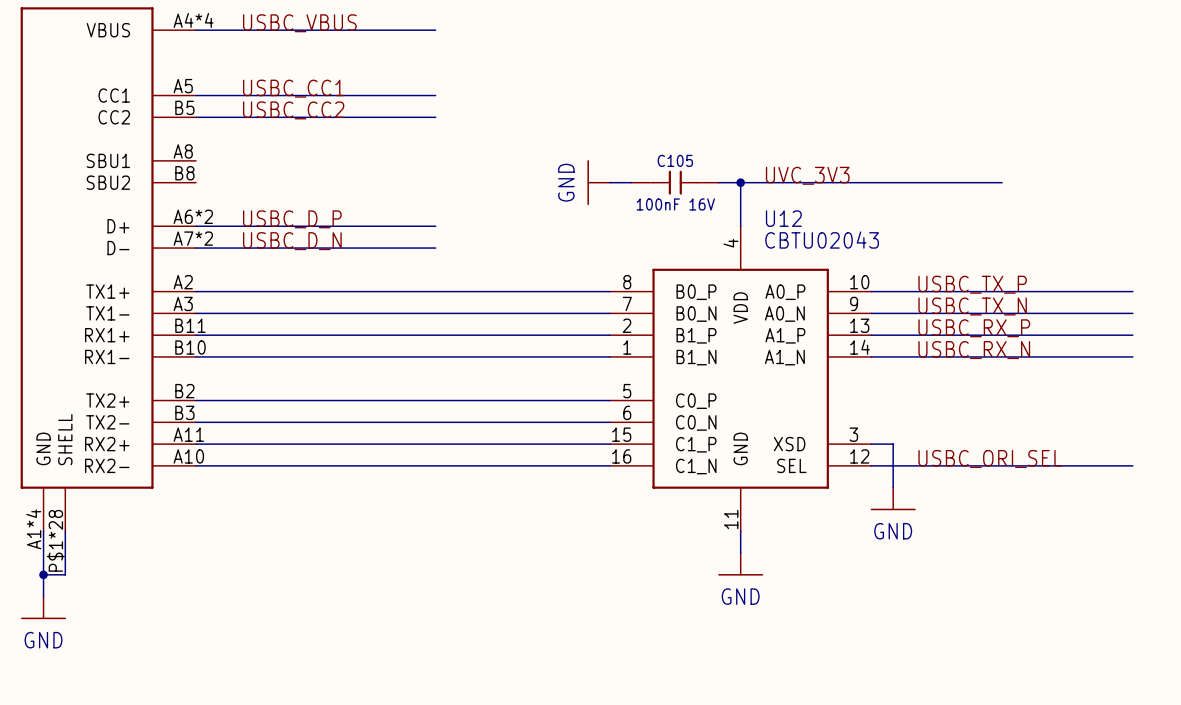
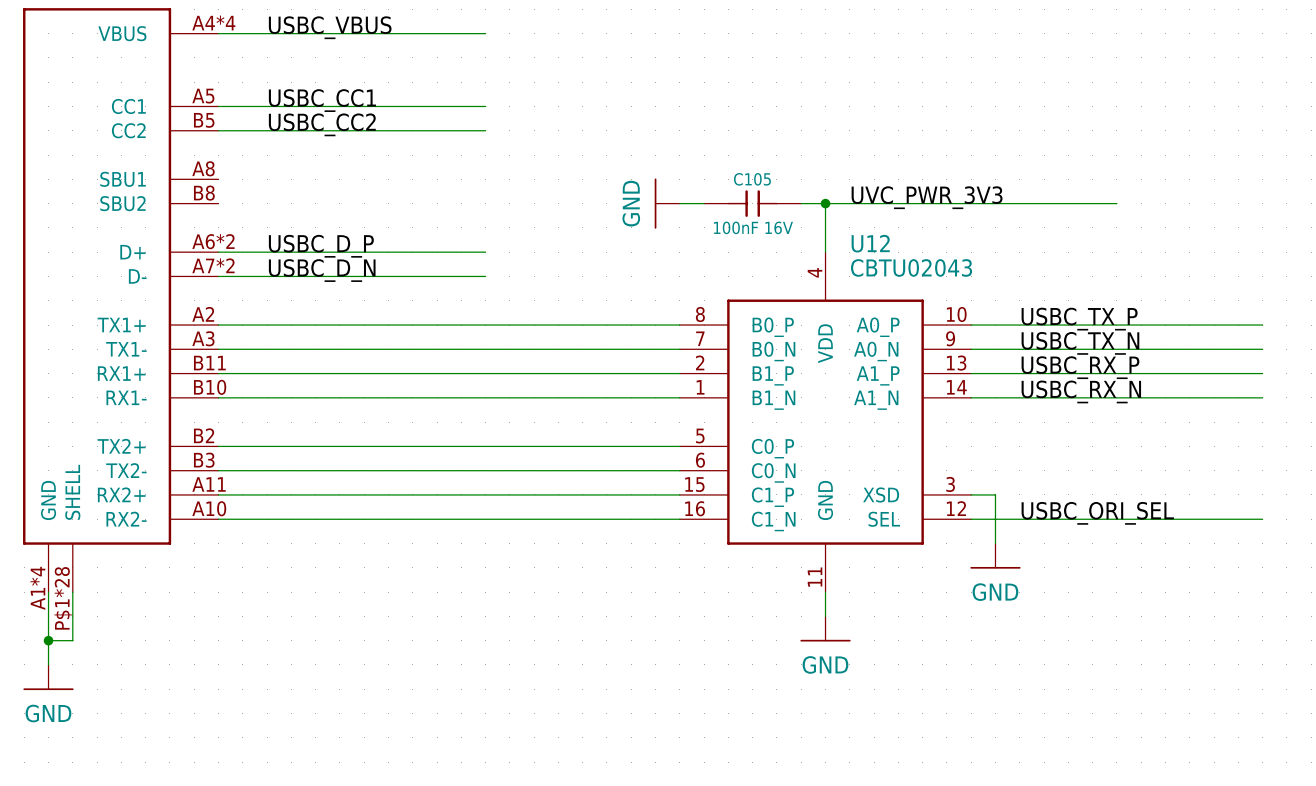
label: UVC_3V3 (807, 175) -> UVC_PWR_3V3 (927, 197)

